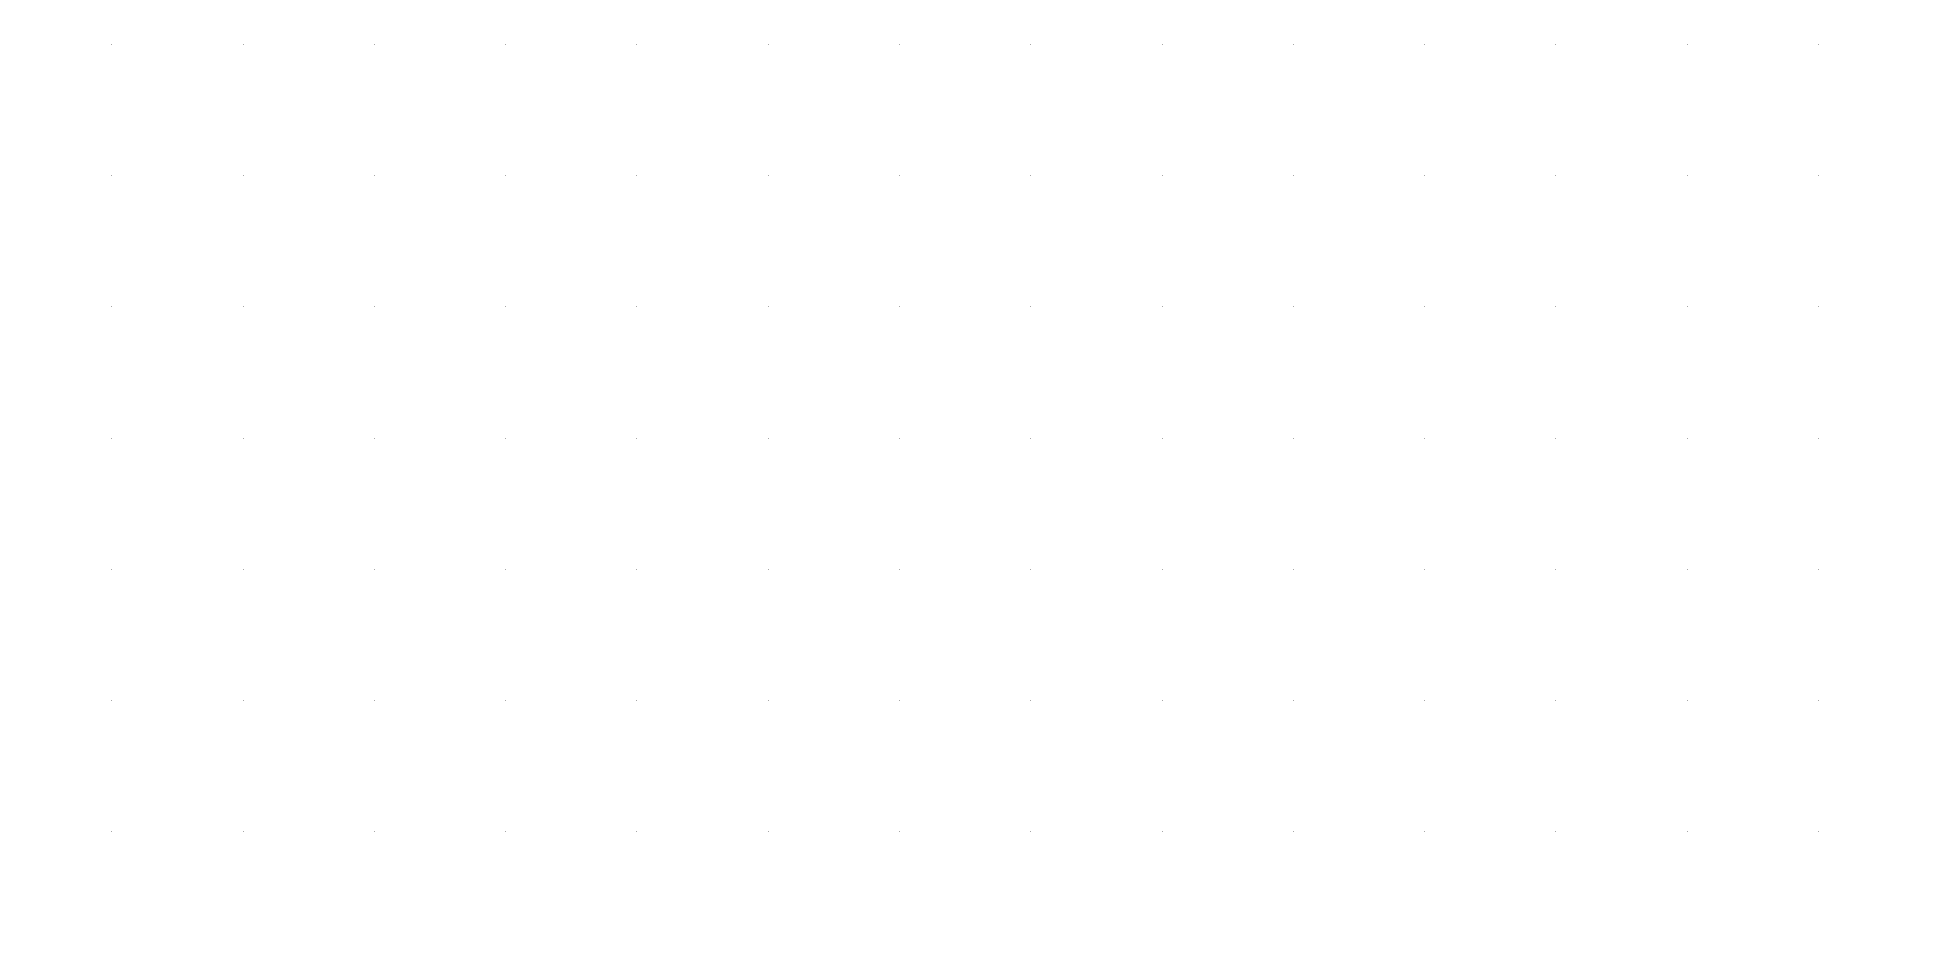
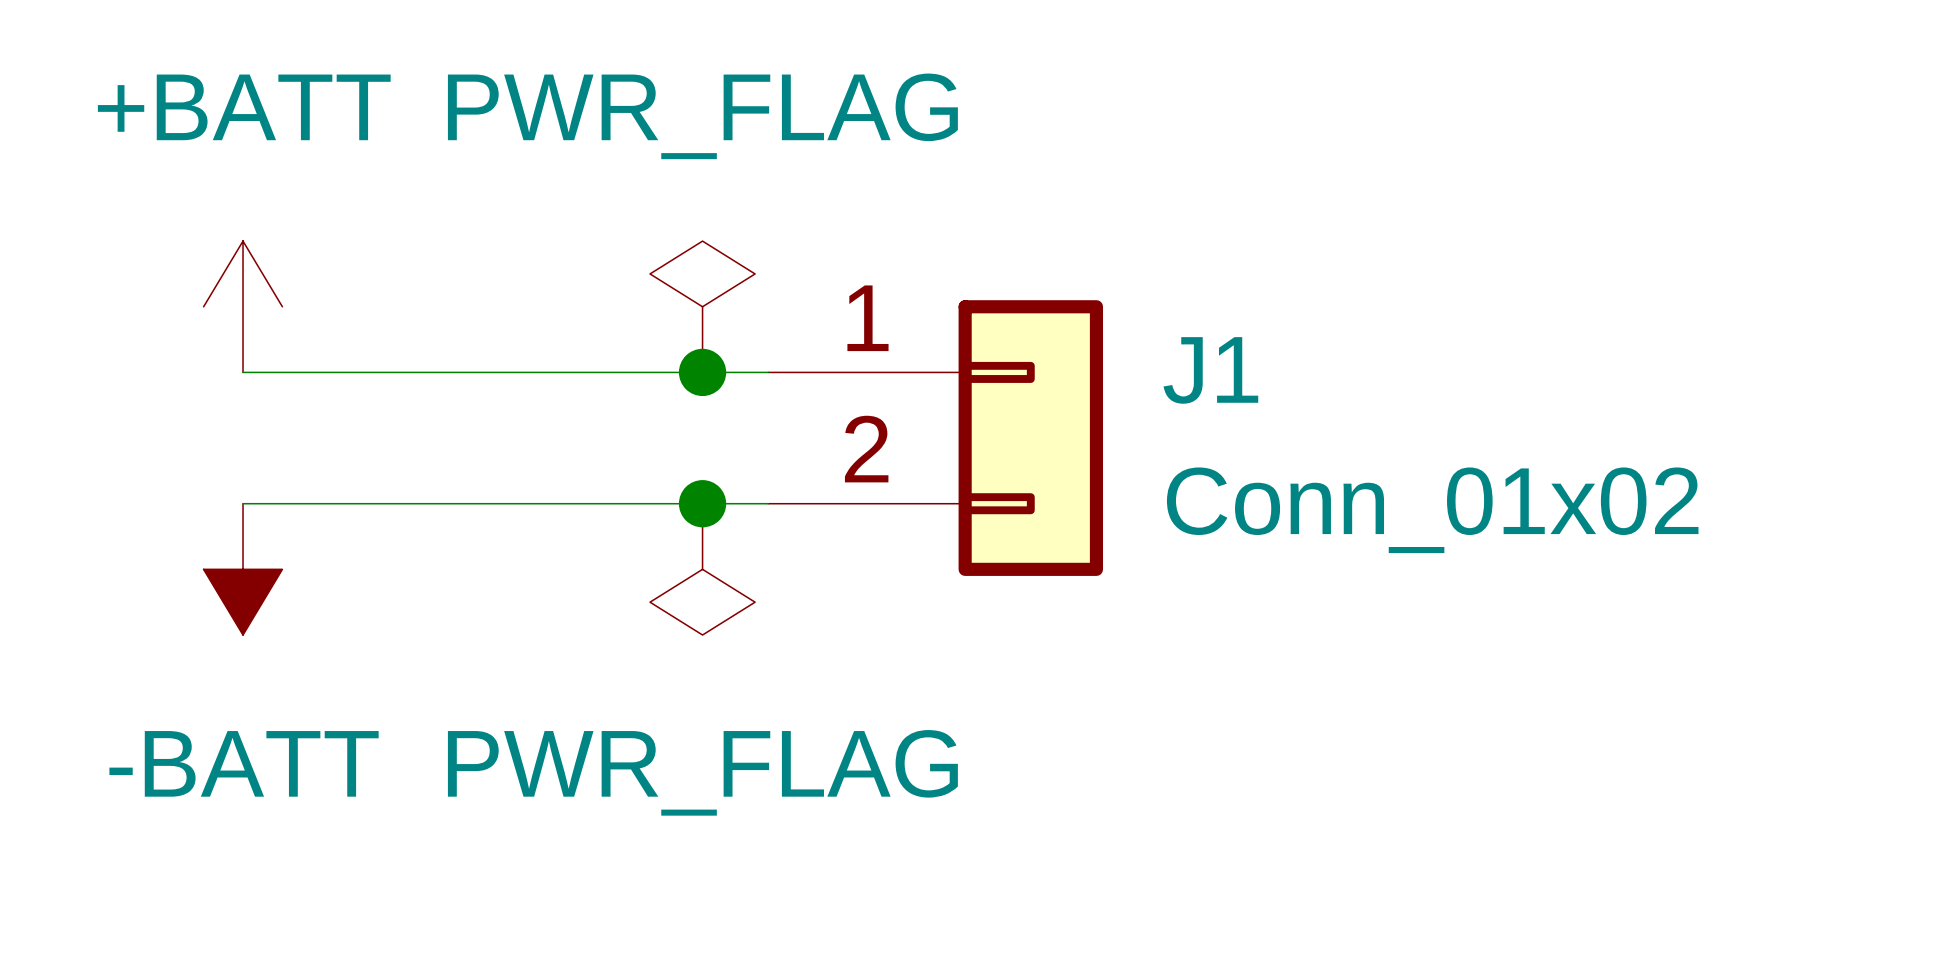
power symbol: none -> +BATT (243, 306)
power symbol: none -> PWR_FLAG (702, 306)
wire: none -> (243, 372) (768, 372)
junction: none -> (702, 372)
J1: none -> Conn_01x02 (935, 438)
wire: none -> (243, 503) (768, 503)
junction: none -> (702, 503)
power symbol: none -> -BATT (243, 569)
power symbol: none -> PWR_FLAG (702, 569)

